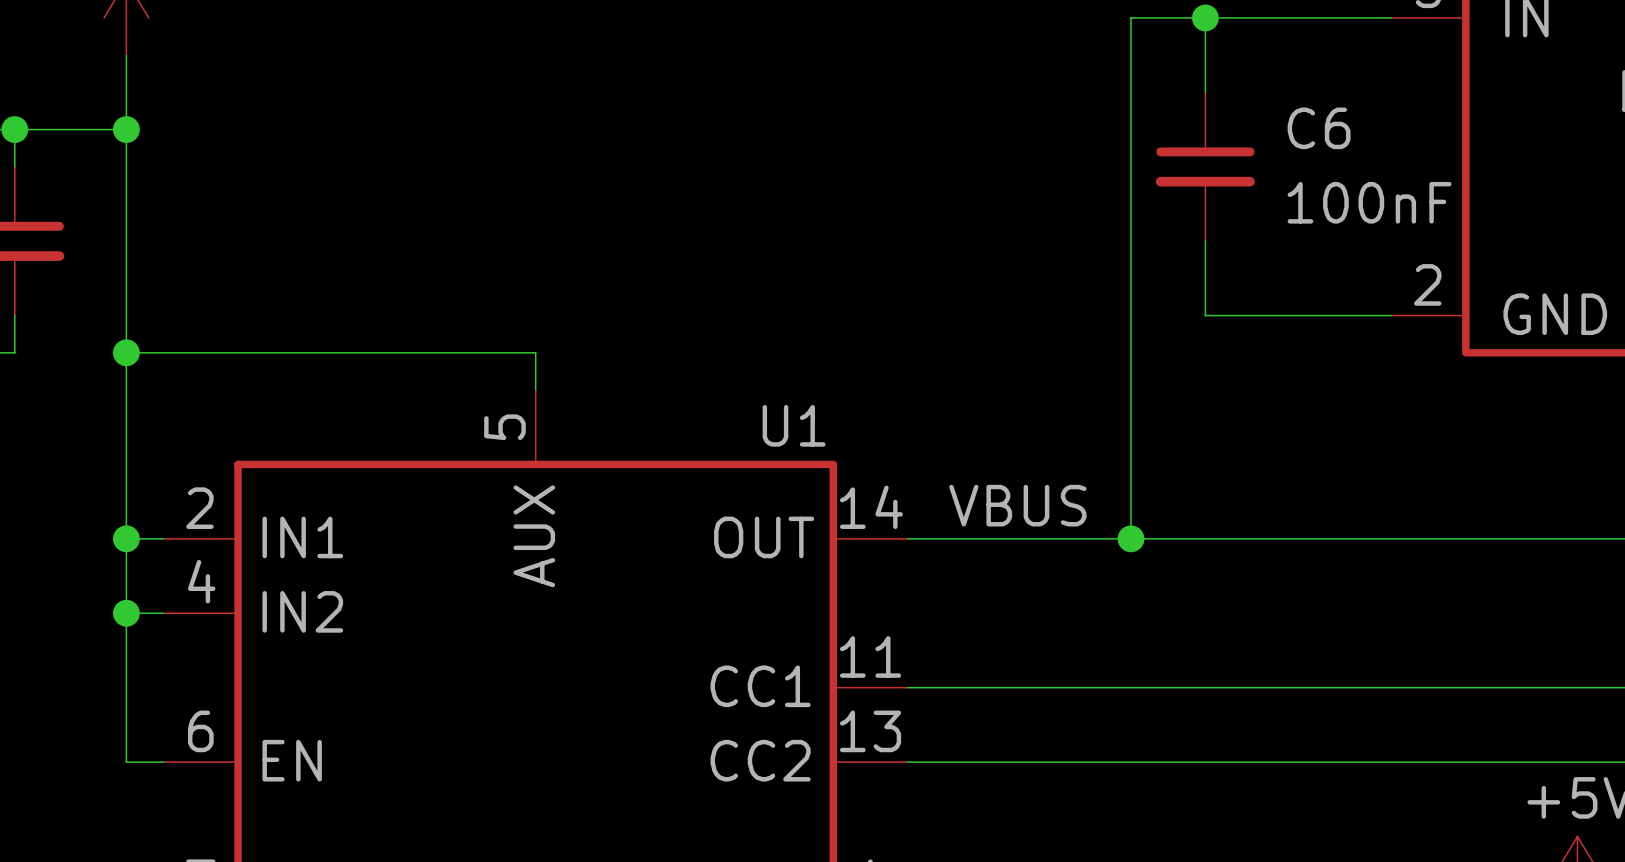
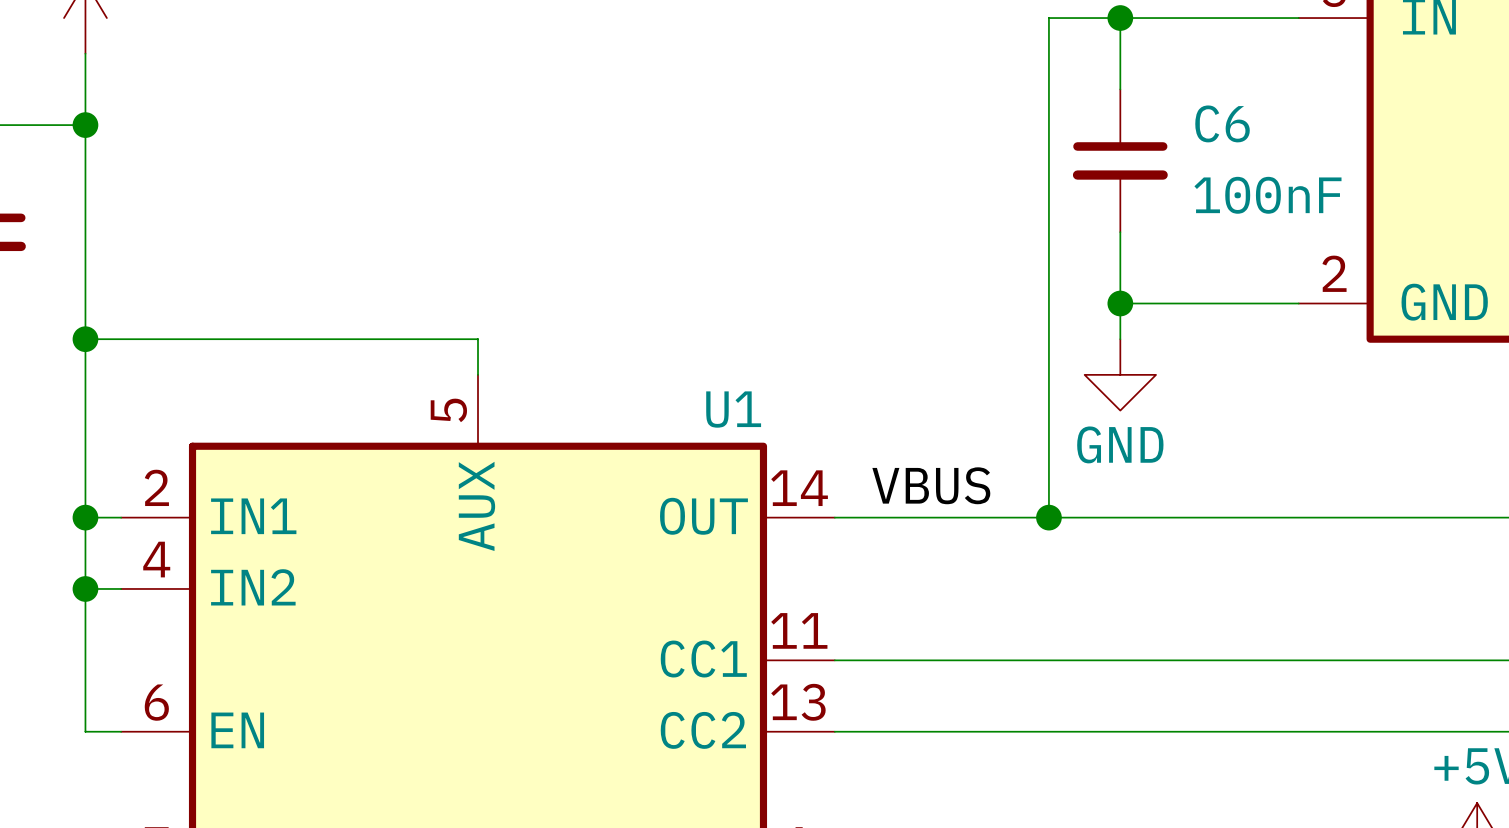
wire: none -> (1120, 303) (1120, 339)
junction: none -> (1120, 303)
power symbol: none -> GND (1120, 374)

